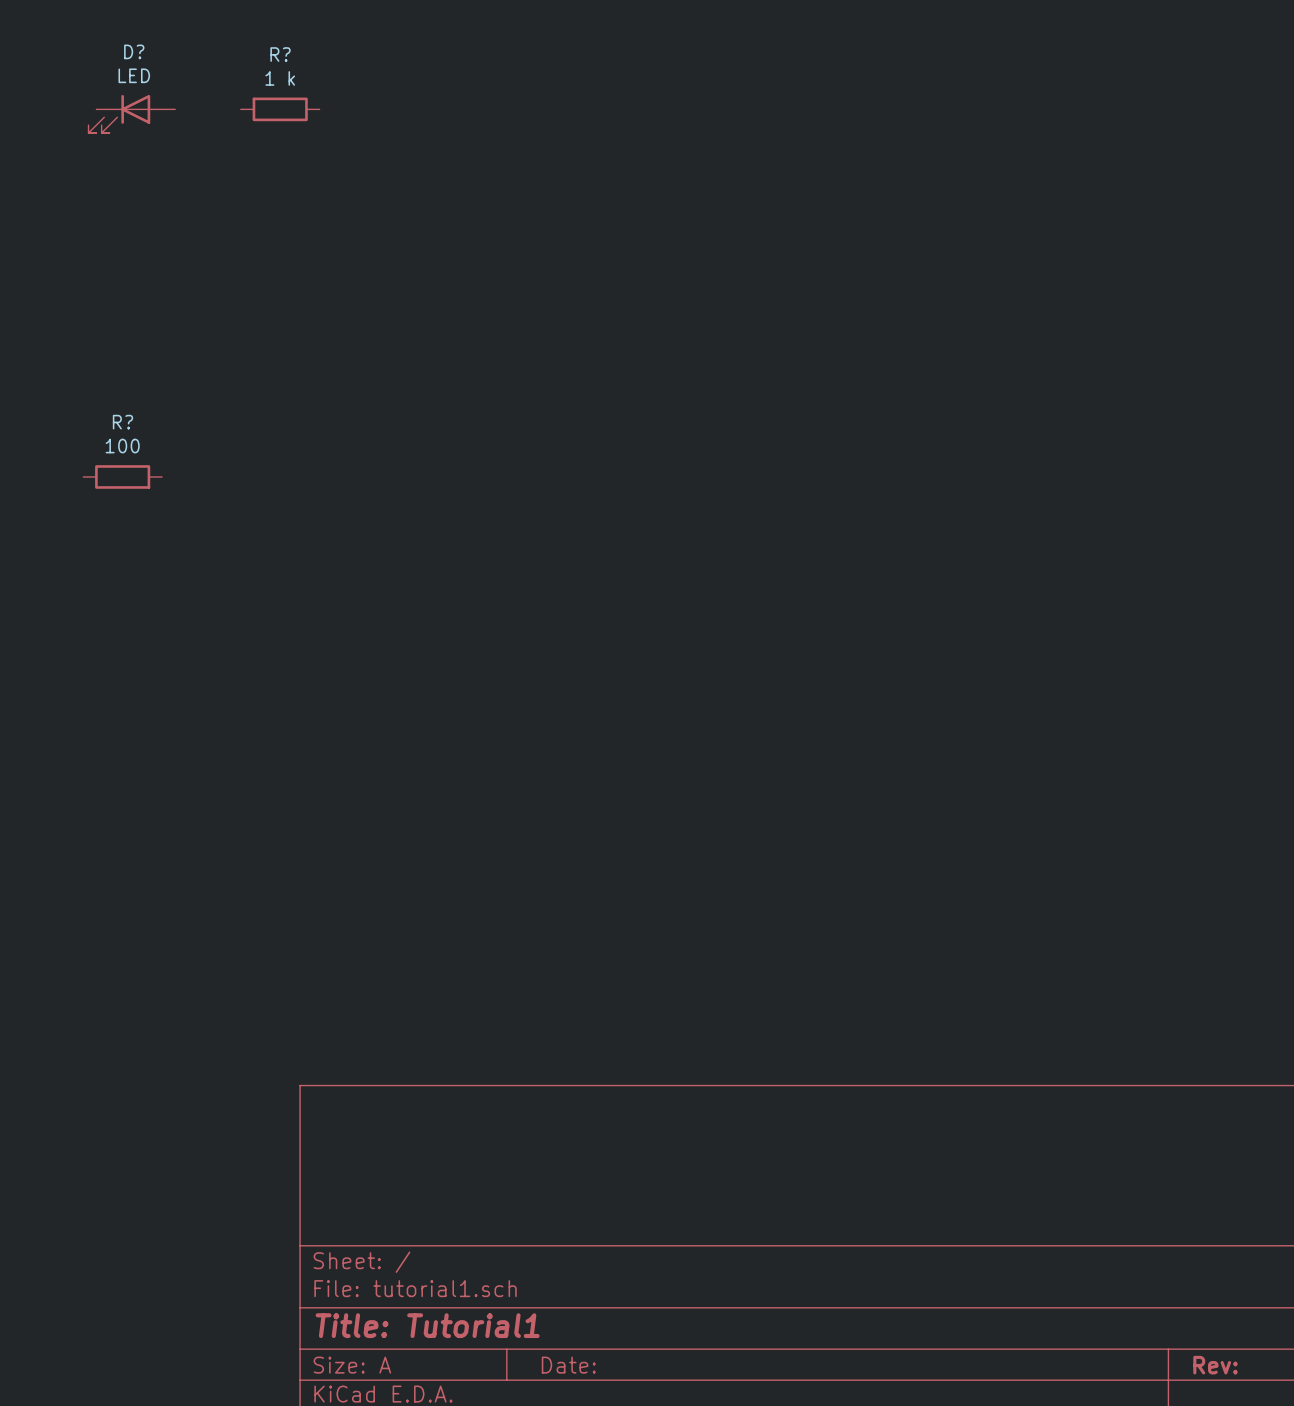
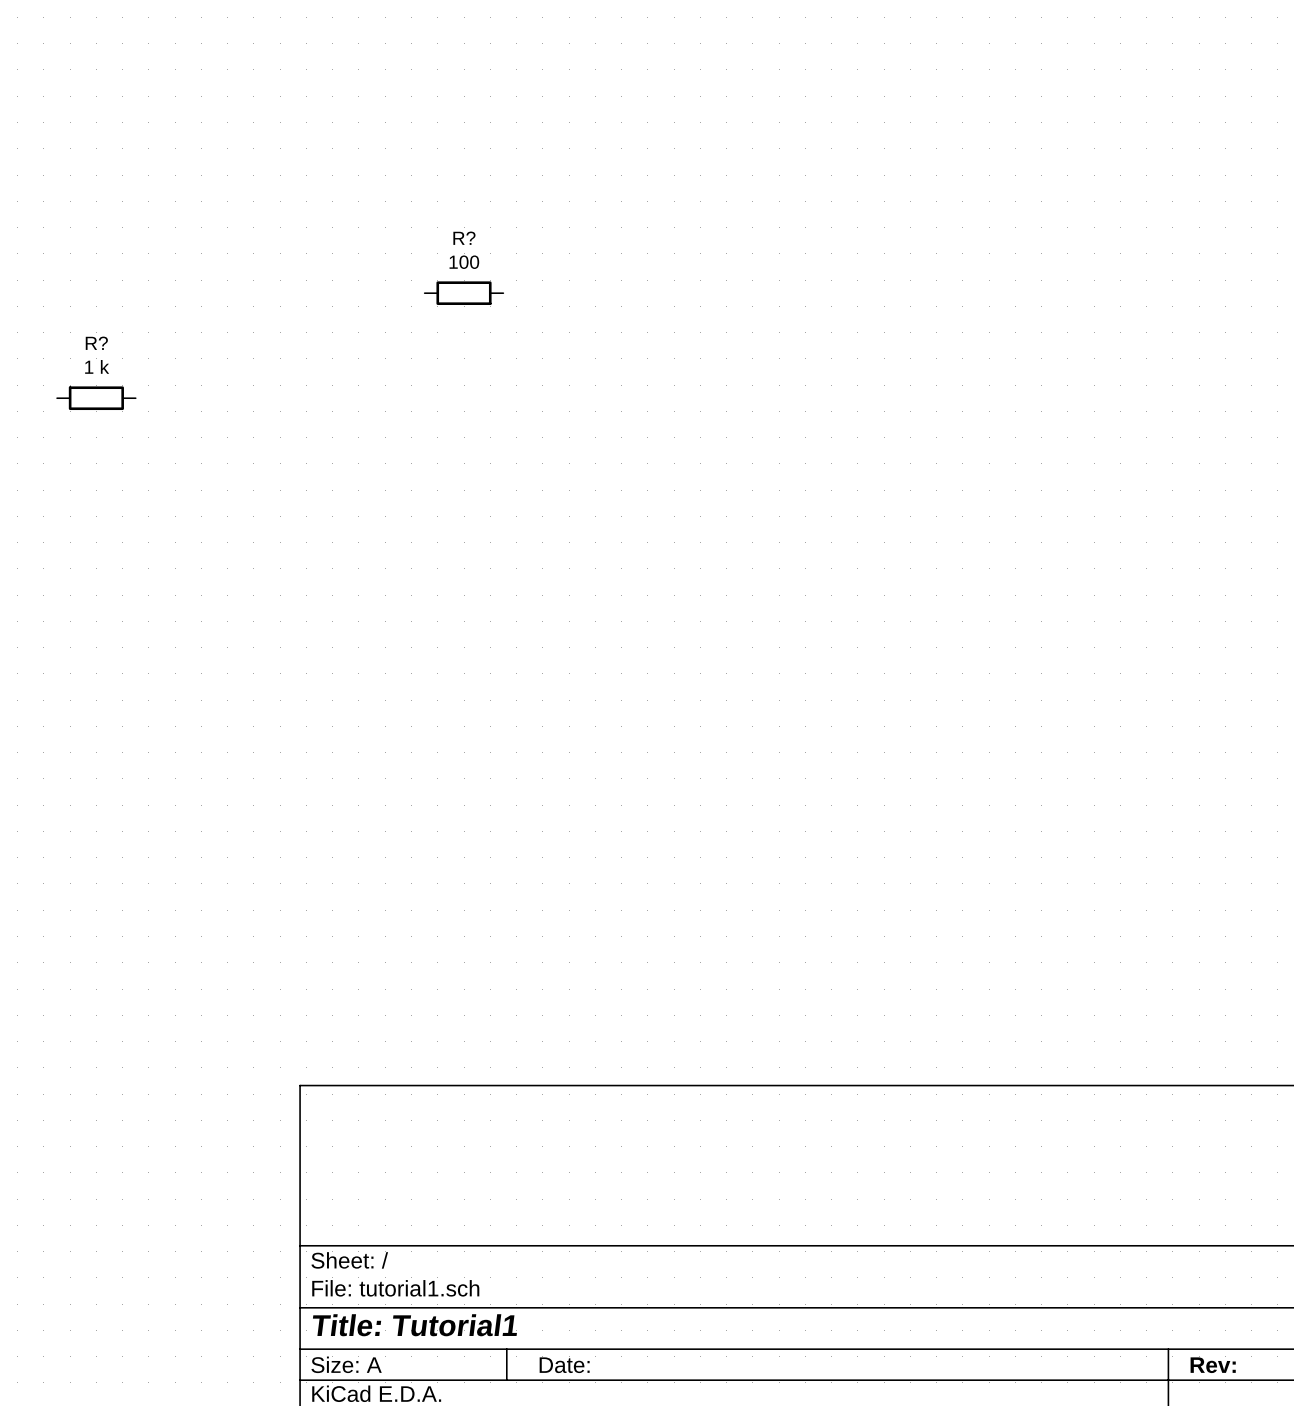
R?: 1 k (280, 109) -> none
D?: LED (131, 113) -> none
R?: none -> 100 (464, 293)
R?: none -> 1 k (96, 398)
R?: 100 (122, 476) -> none

